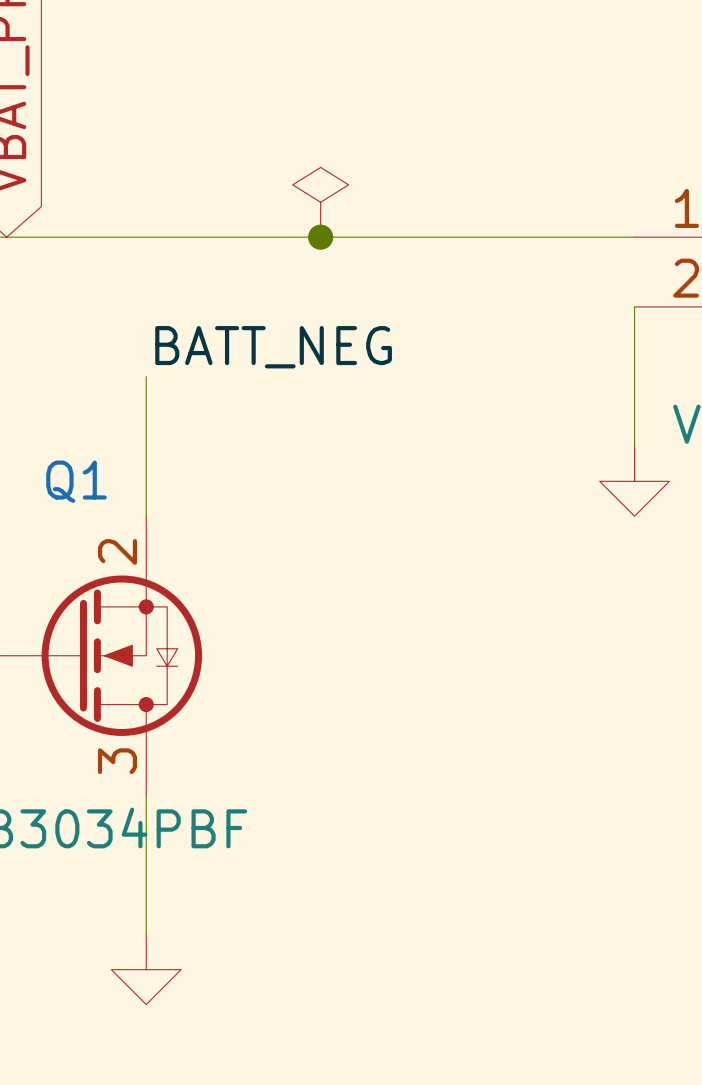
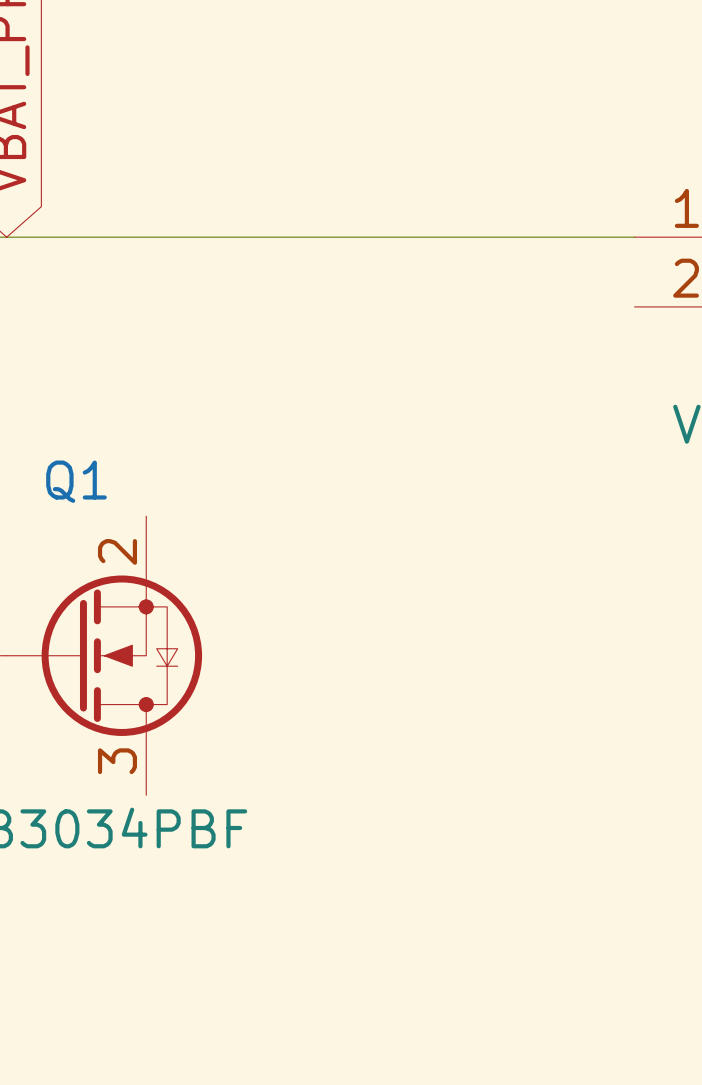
power symbol: (320, 202) -> none
junction: (320, 237) -> none
wire: (634, 306) (634, 446) -> none
label: BATT_NEG (273, 347) -> none
wire: (146, 376) (146, 516) -> none
power symbol: (634, 481) -> none
wire: (146, 795) (146, 934) -> none
power symbol: (146, 969) -> none

